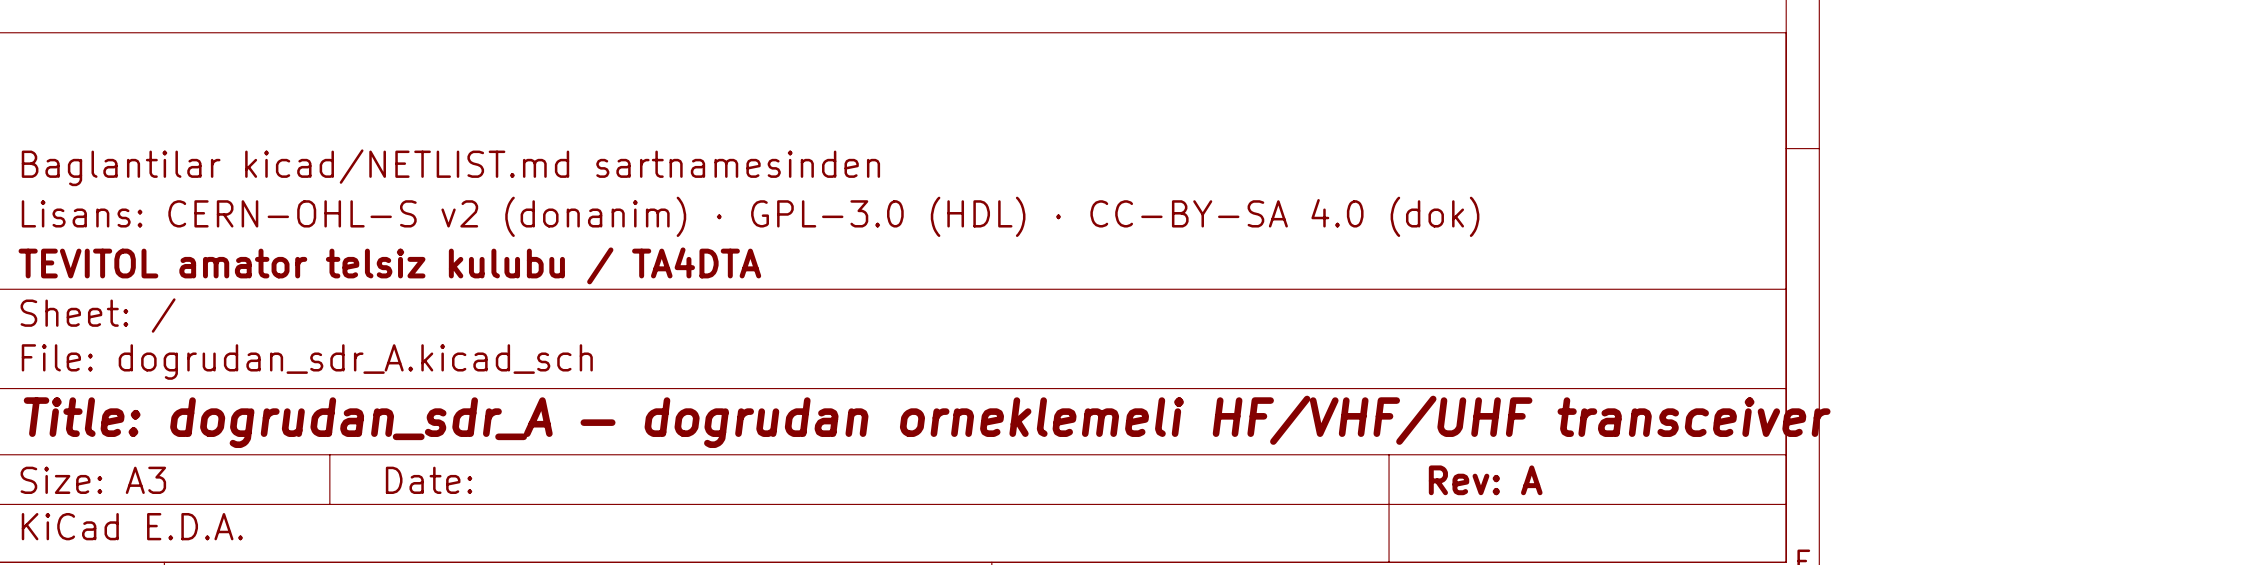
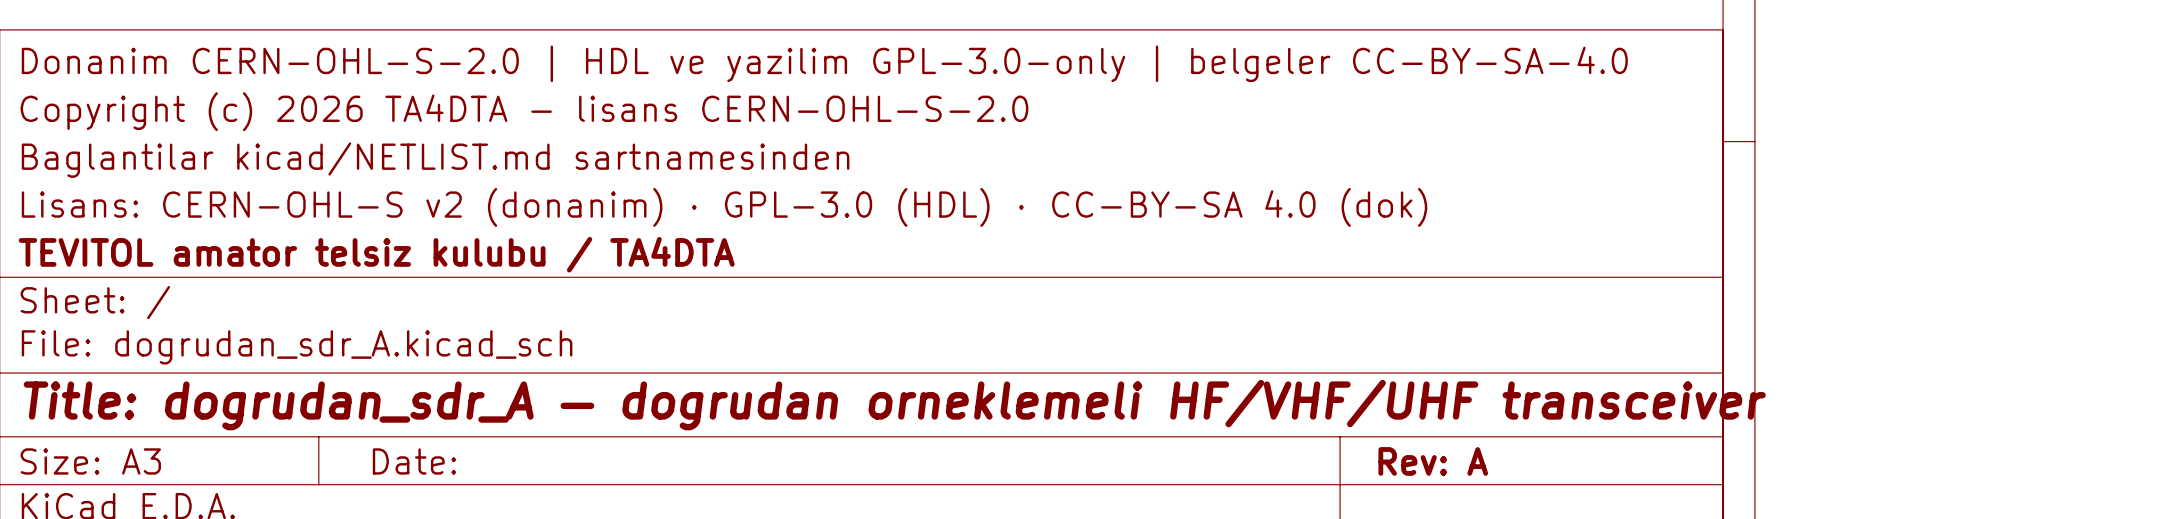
title block: none -> Donanim CERN-OHL-S-2.0 | HDL ve yazilim GPL-3.0-only | belgeler CC-BY-SA-4.0 (824, 63)
title block: none -> Copyright (c) 2026 TA4DTA - lisans CERN-OHL-S-2.0 (524, 111)

